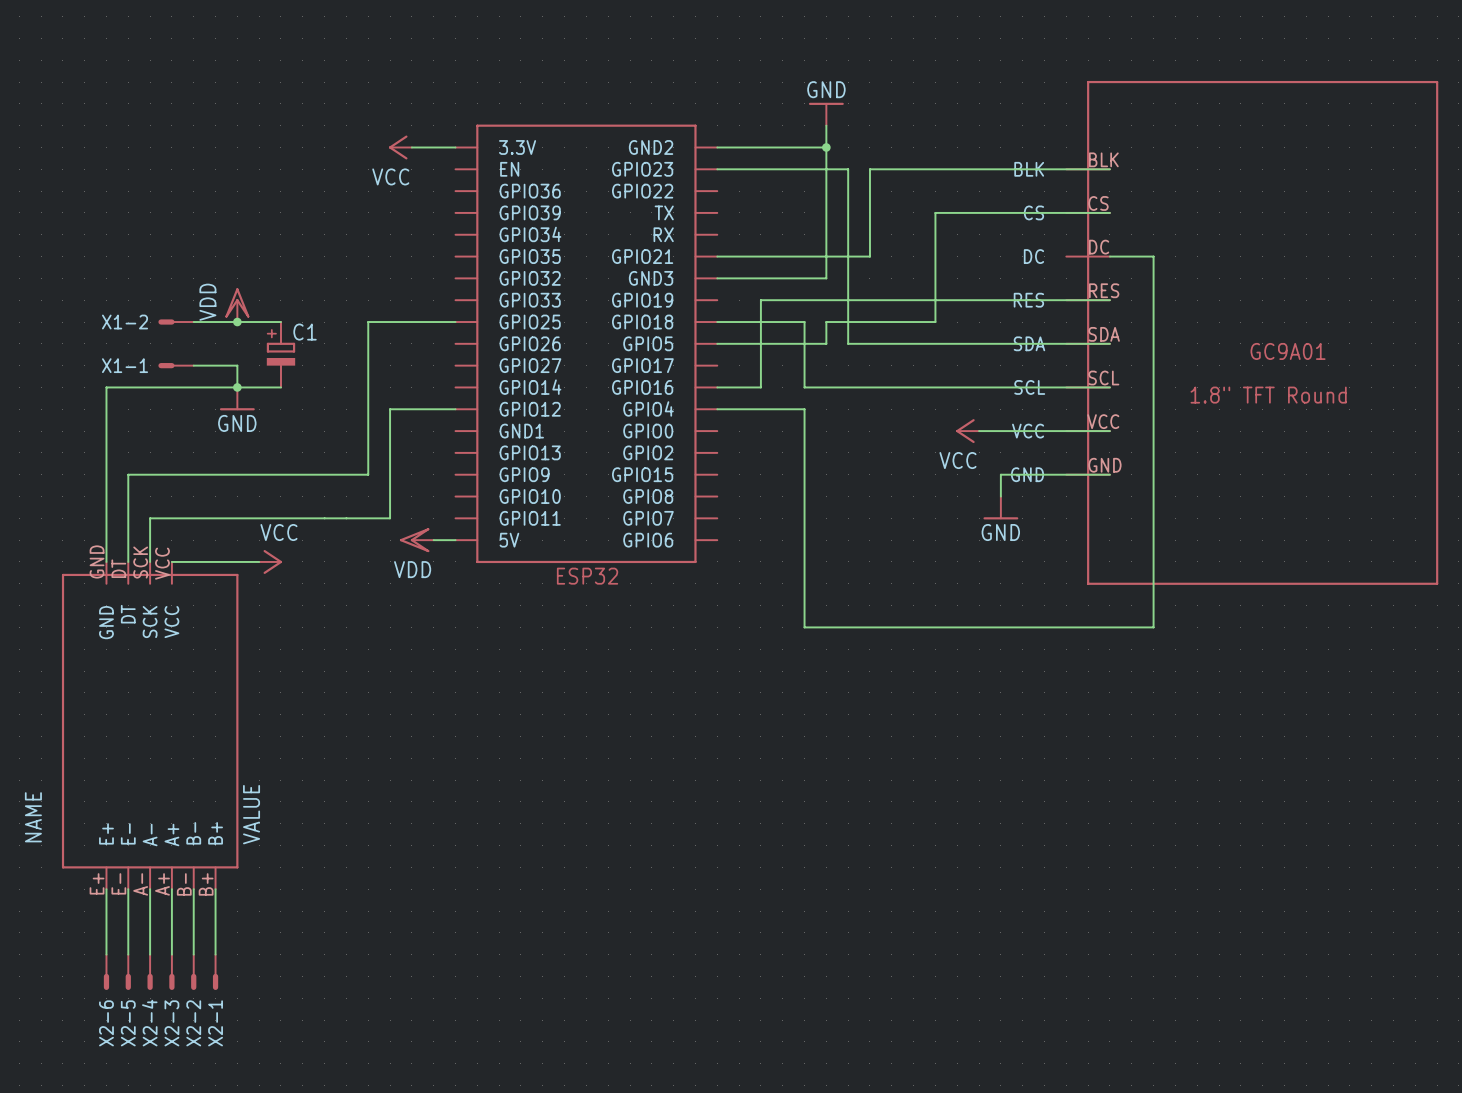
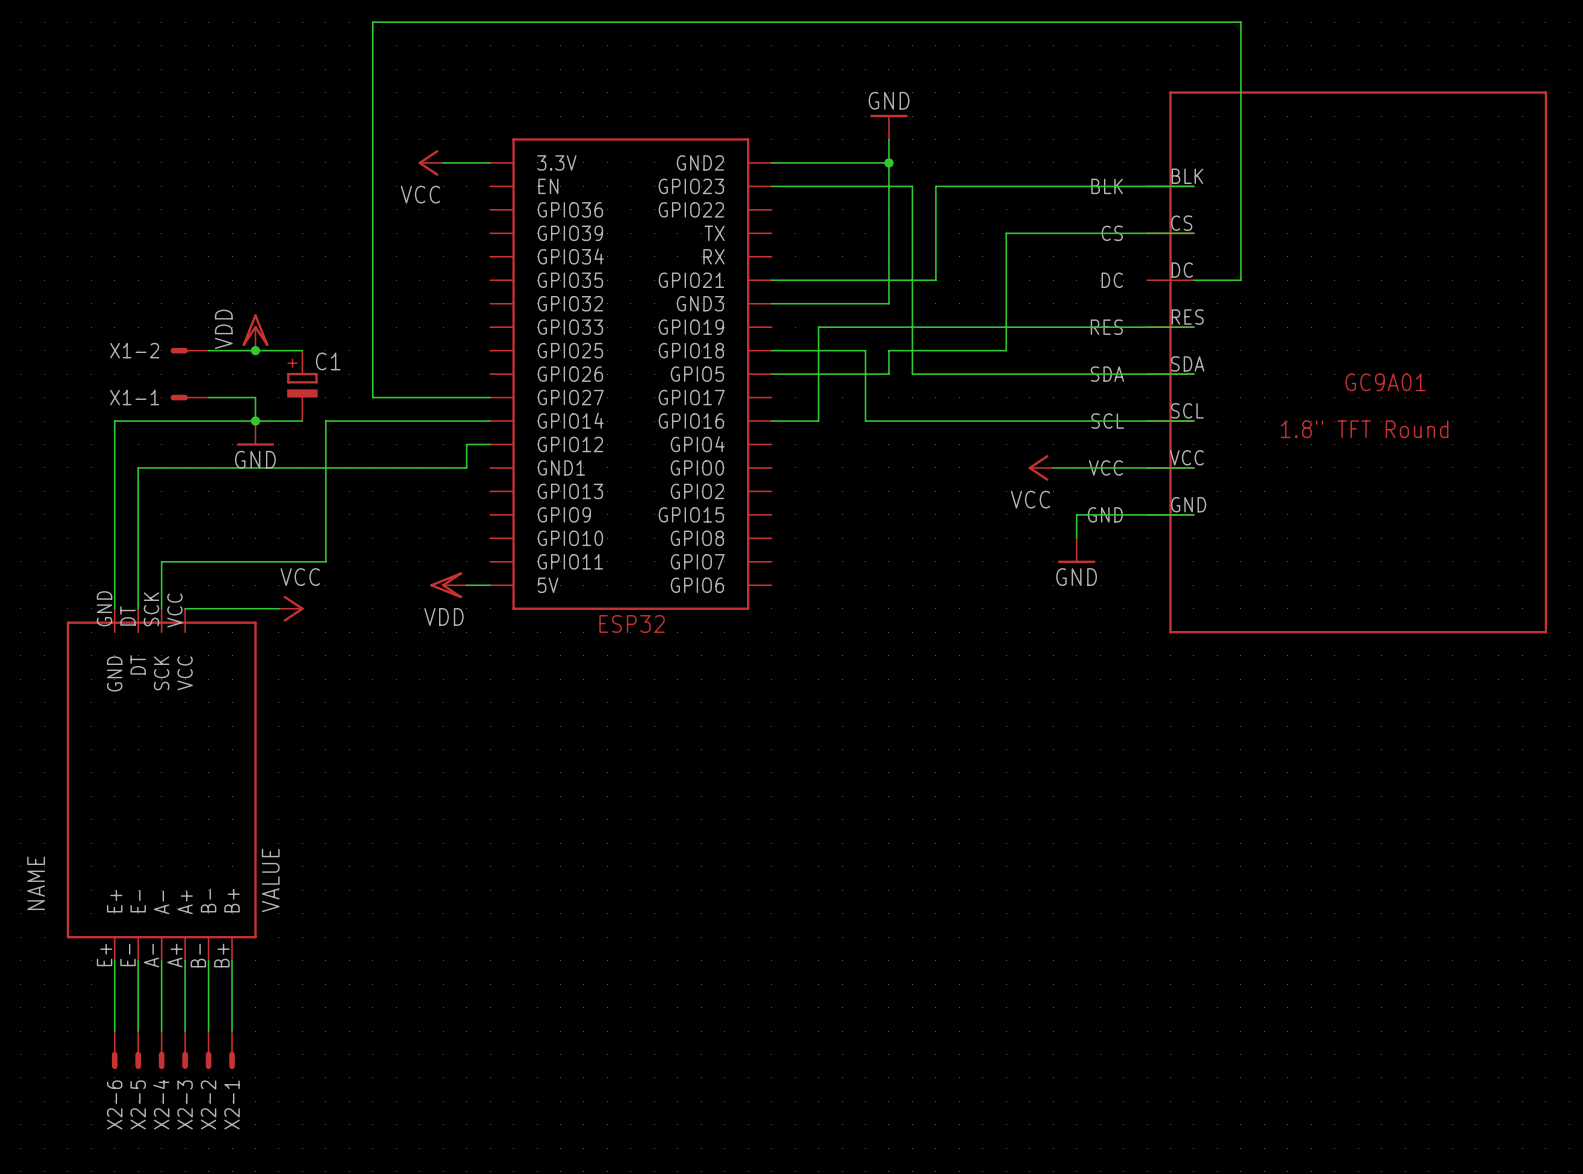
wire: (1153, 256) (1153, 627) (804, 627) (804, 409) (717, 409) -> (1240, 280) (1240, 22) (372, 22) (372, 397) (490, 397)
wire: (455, 322) (368, 322) (368, 474) (128, 474) -> (466, 444) (466, 467) (138, 467) (138, 514)
wire: (433, 409) (390, 409) (390, 518) (302, 518) -> (490, 421) (325, 421) (325, 561)

